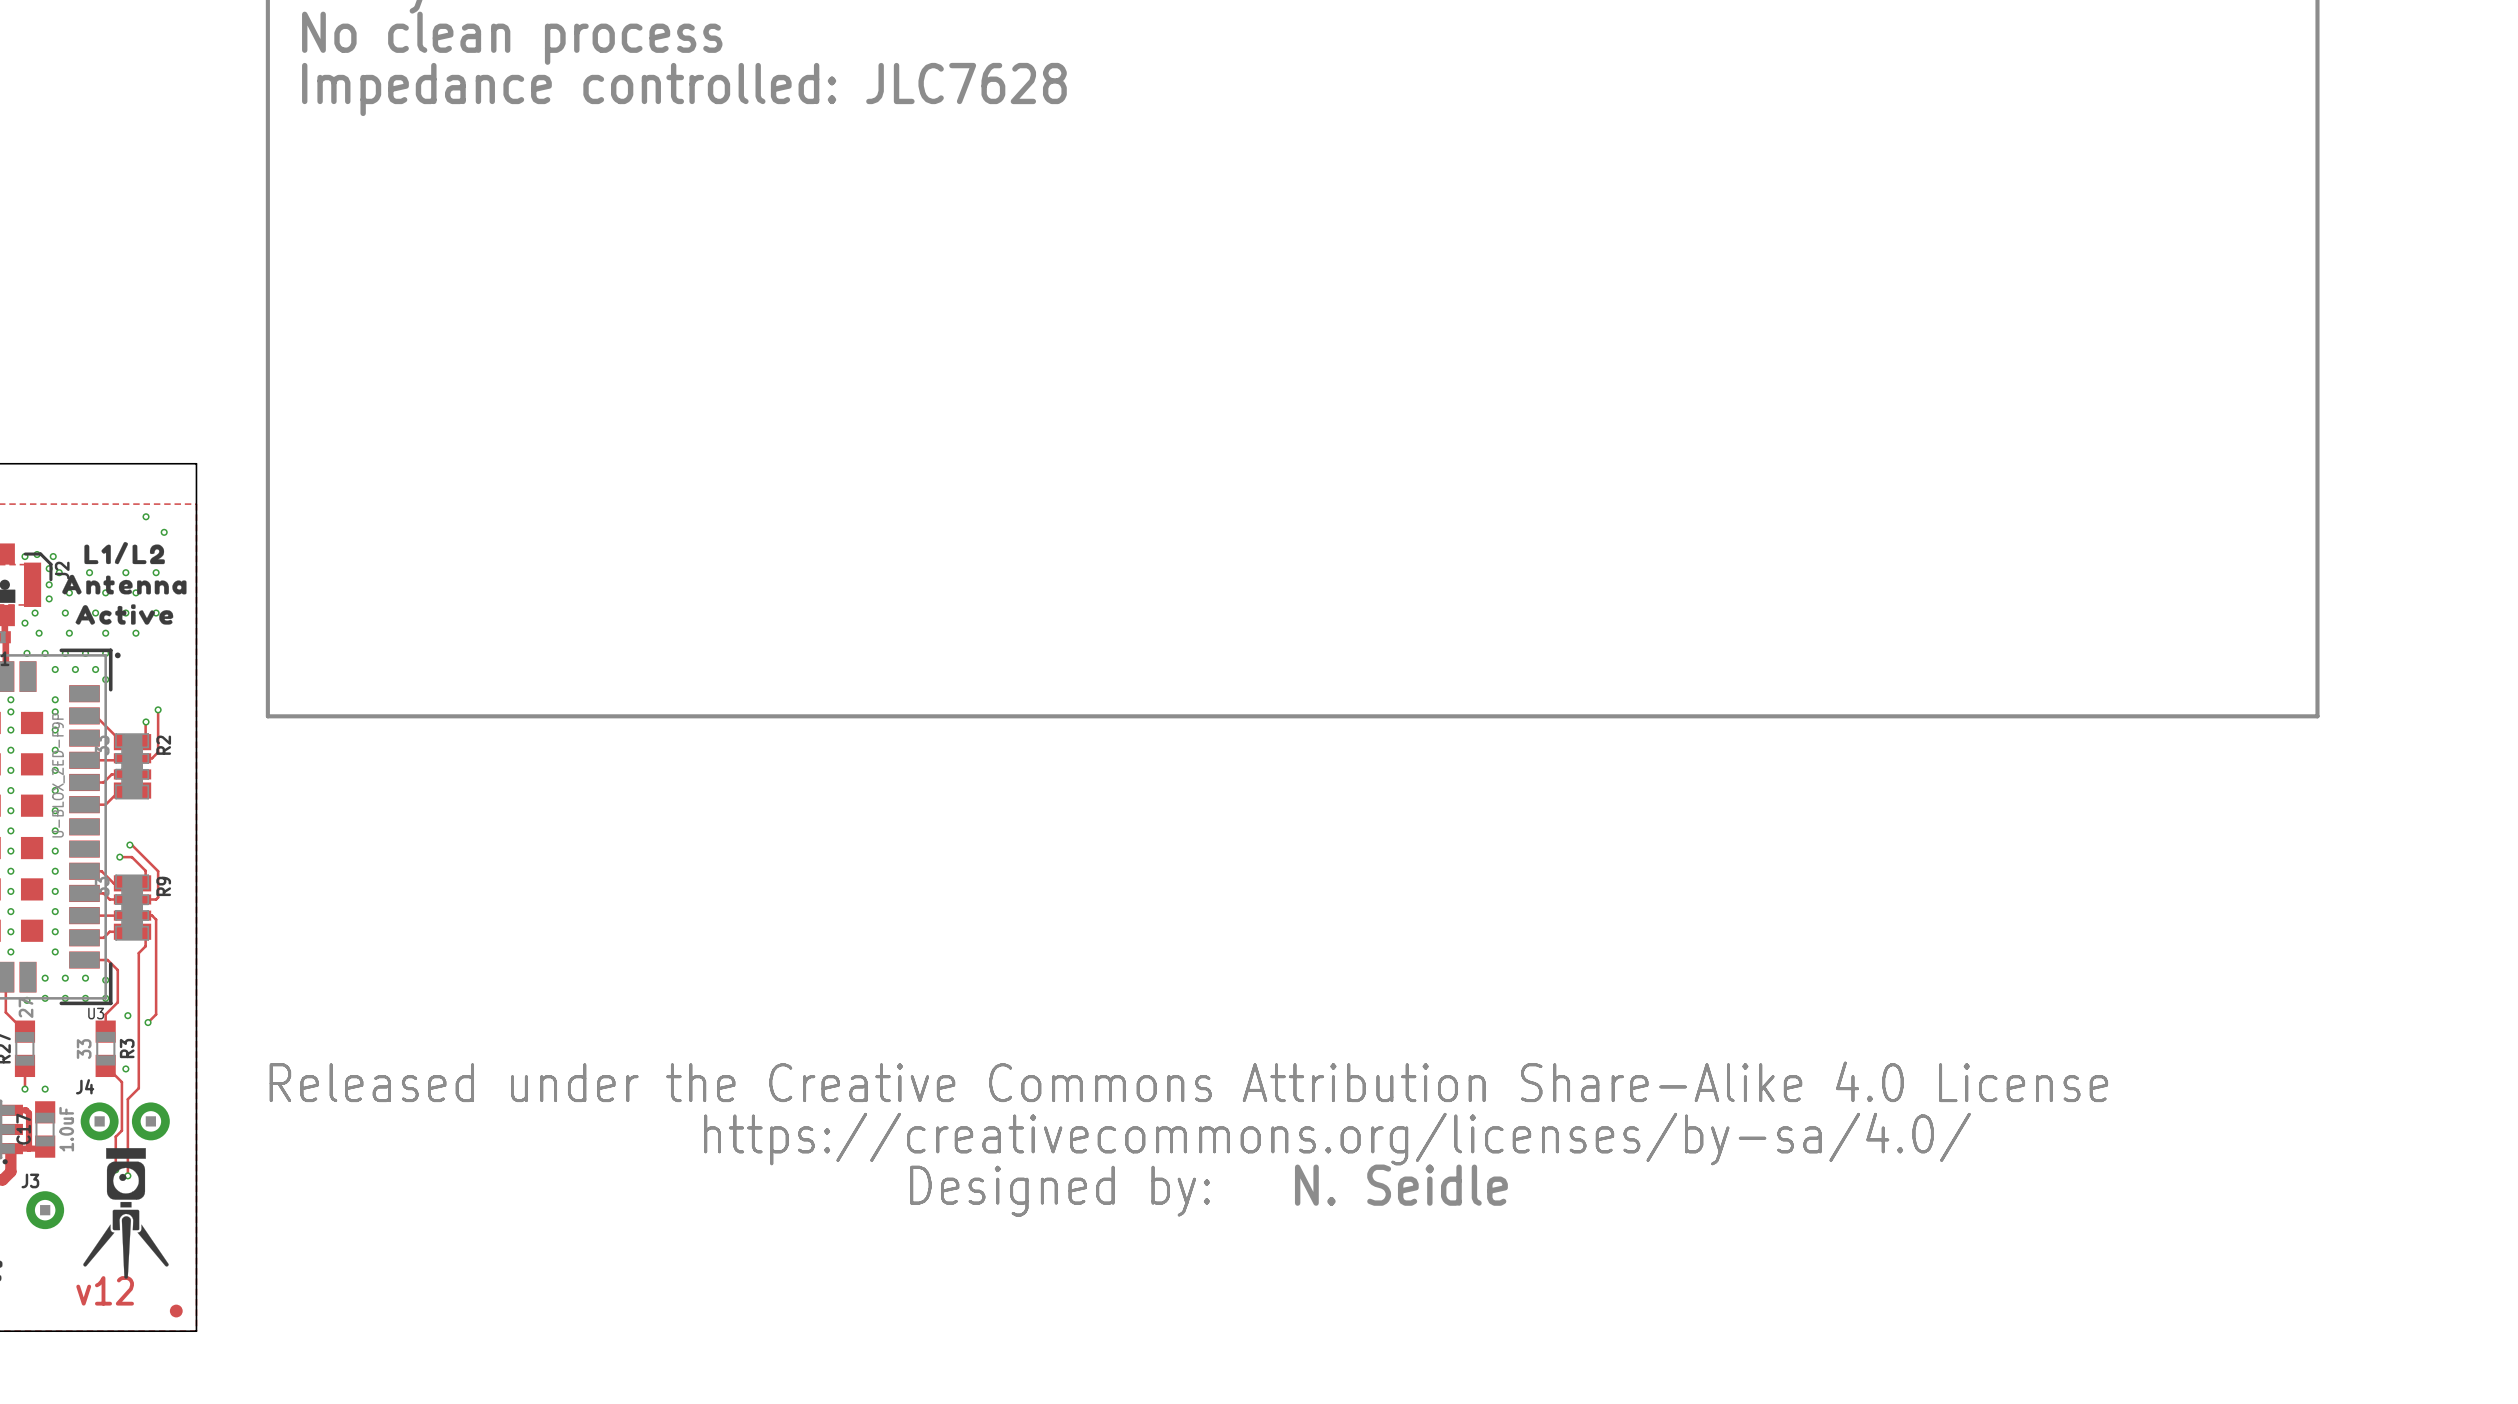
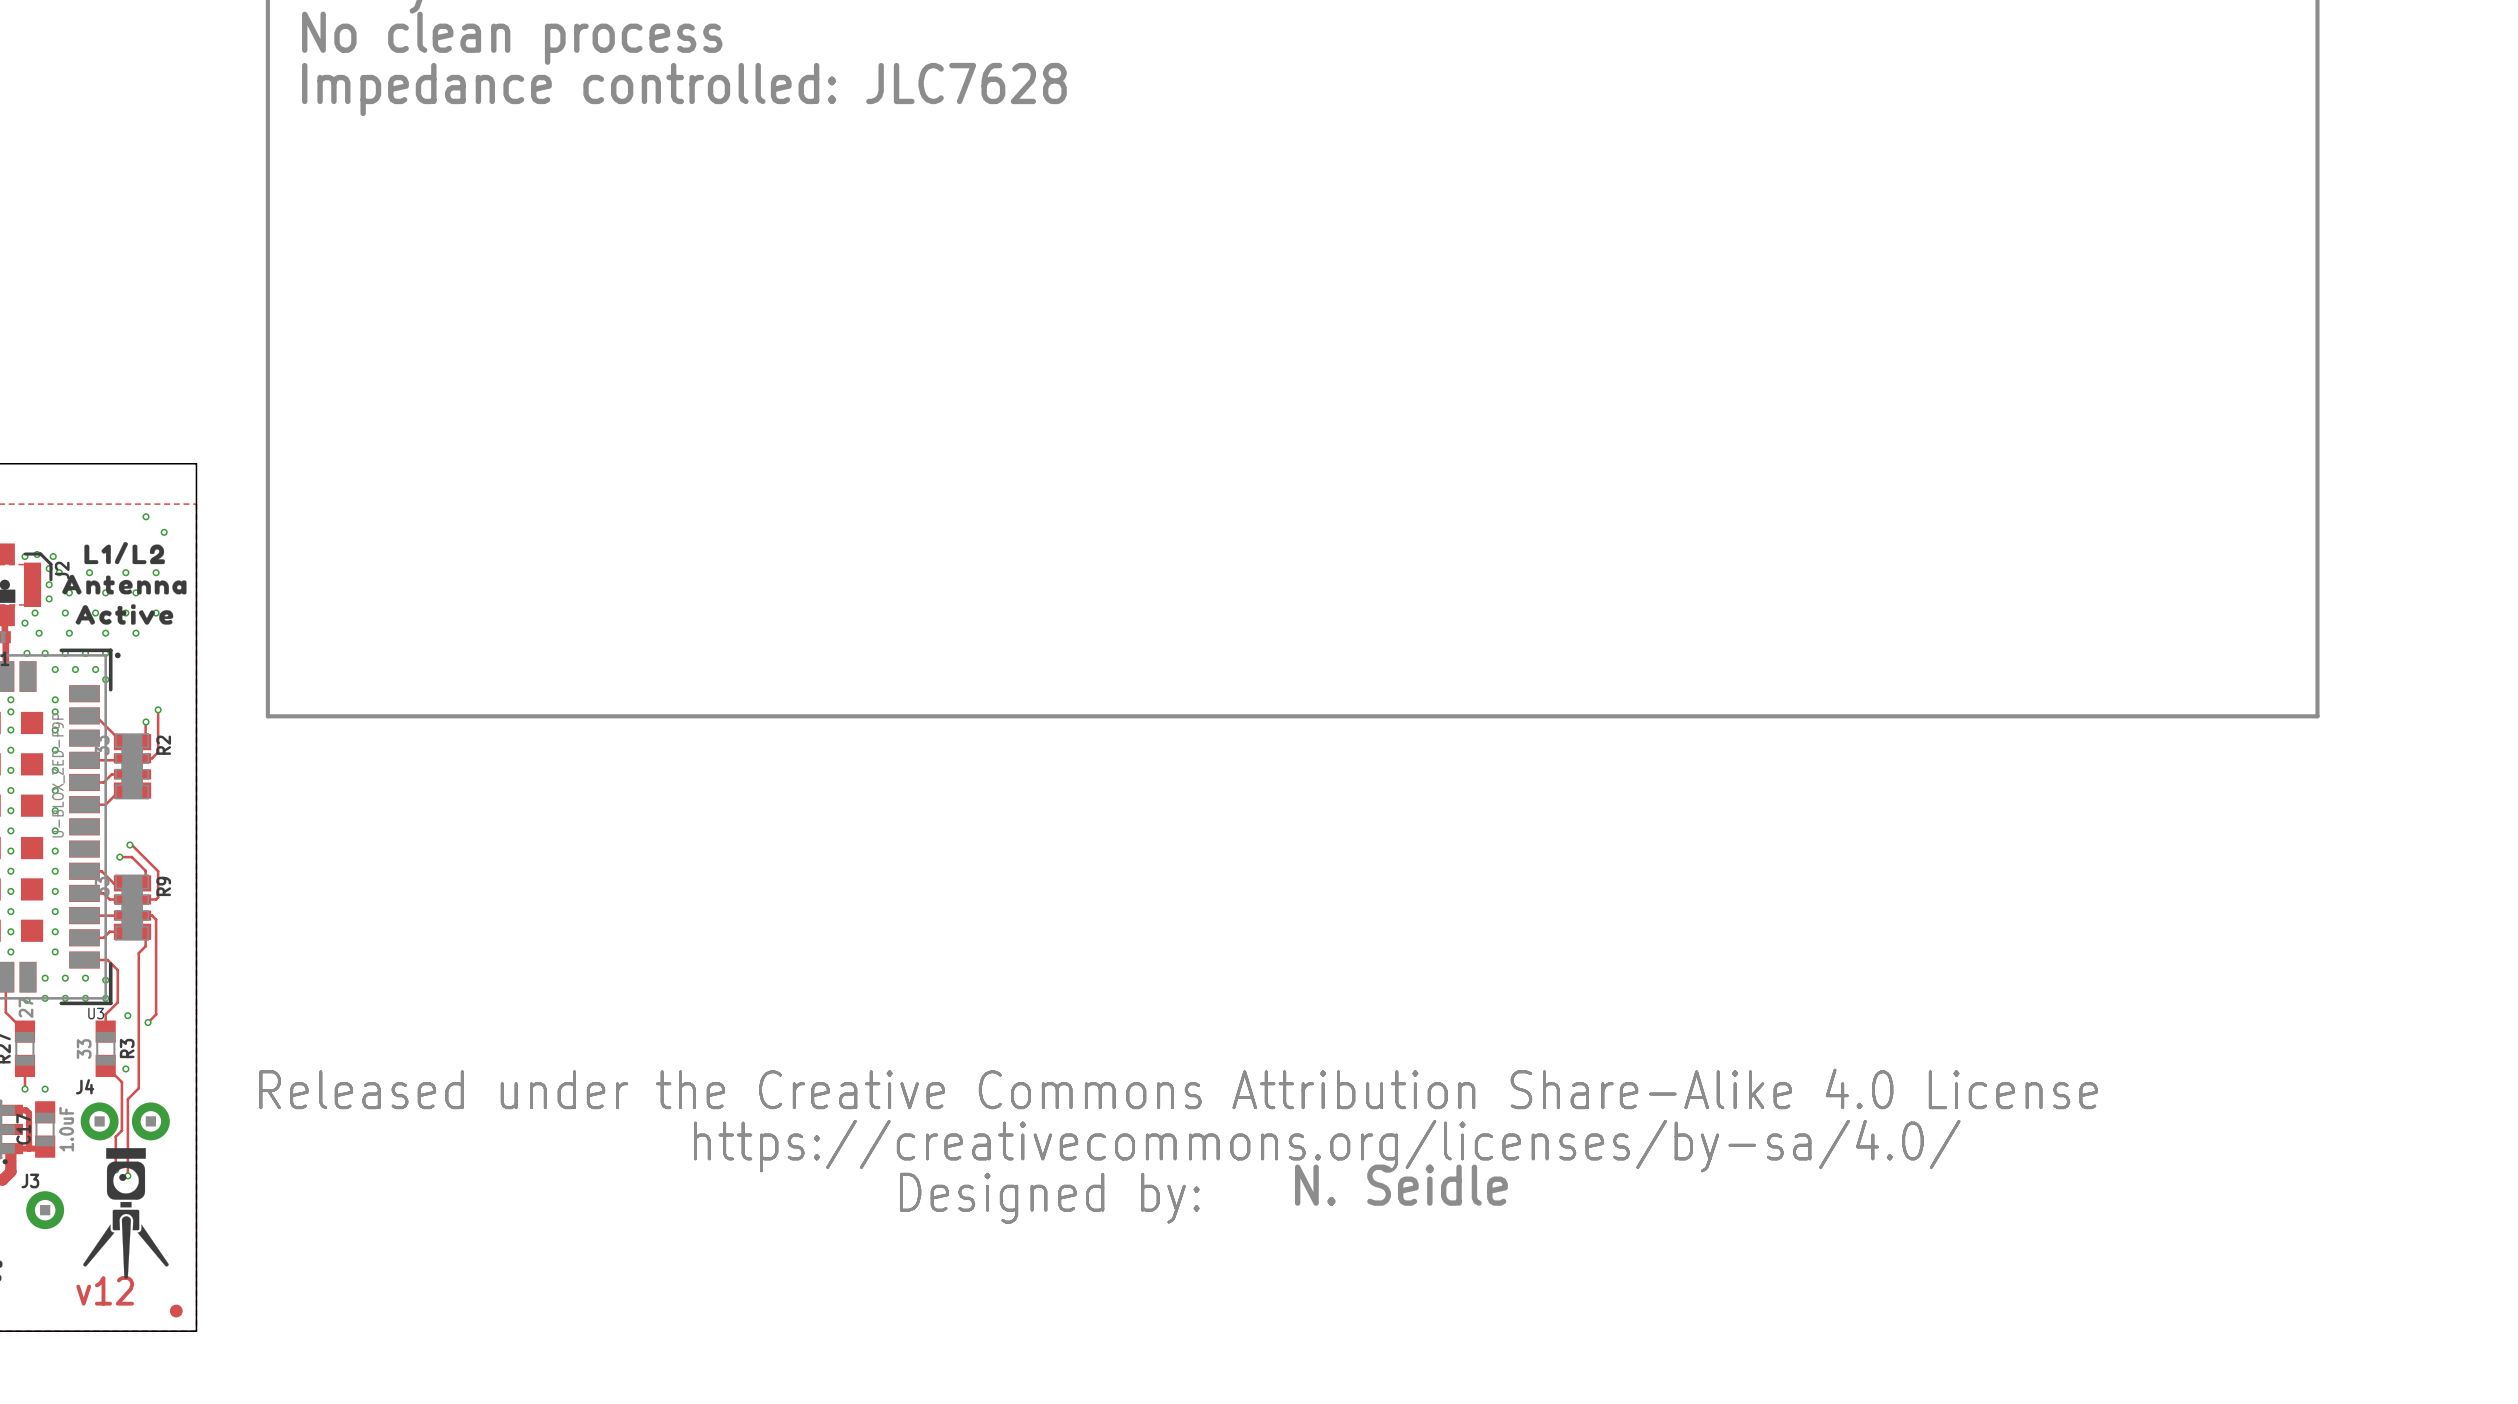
drawing position: (1188, 1139) -> (1178, 1146)

